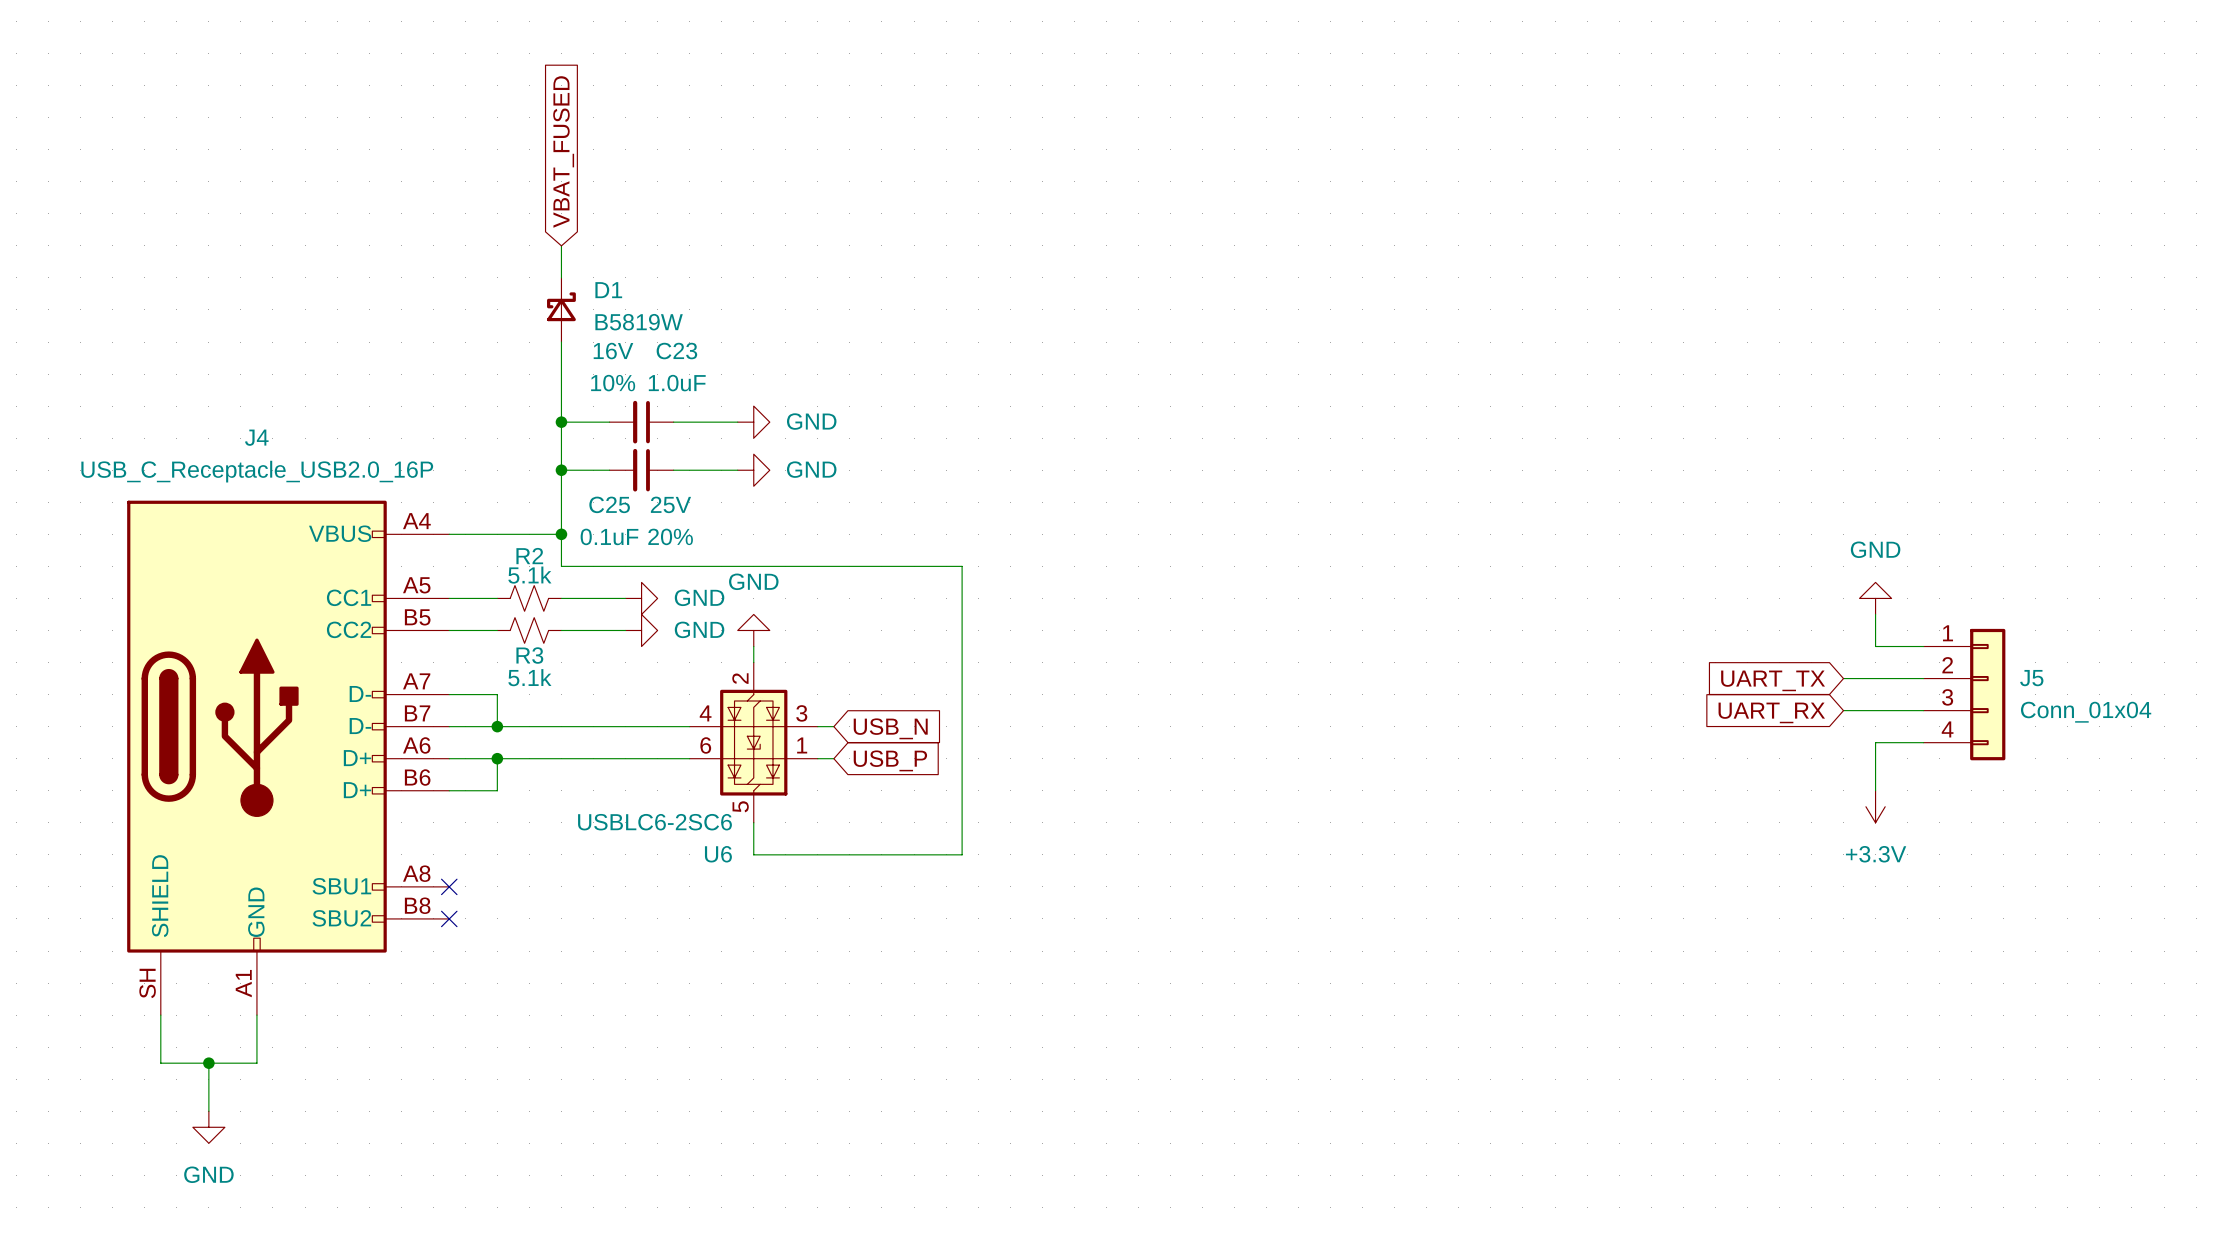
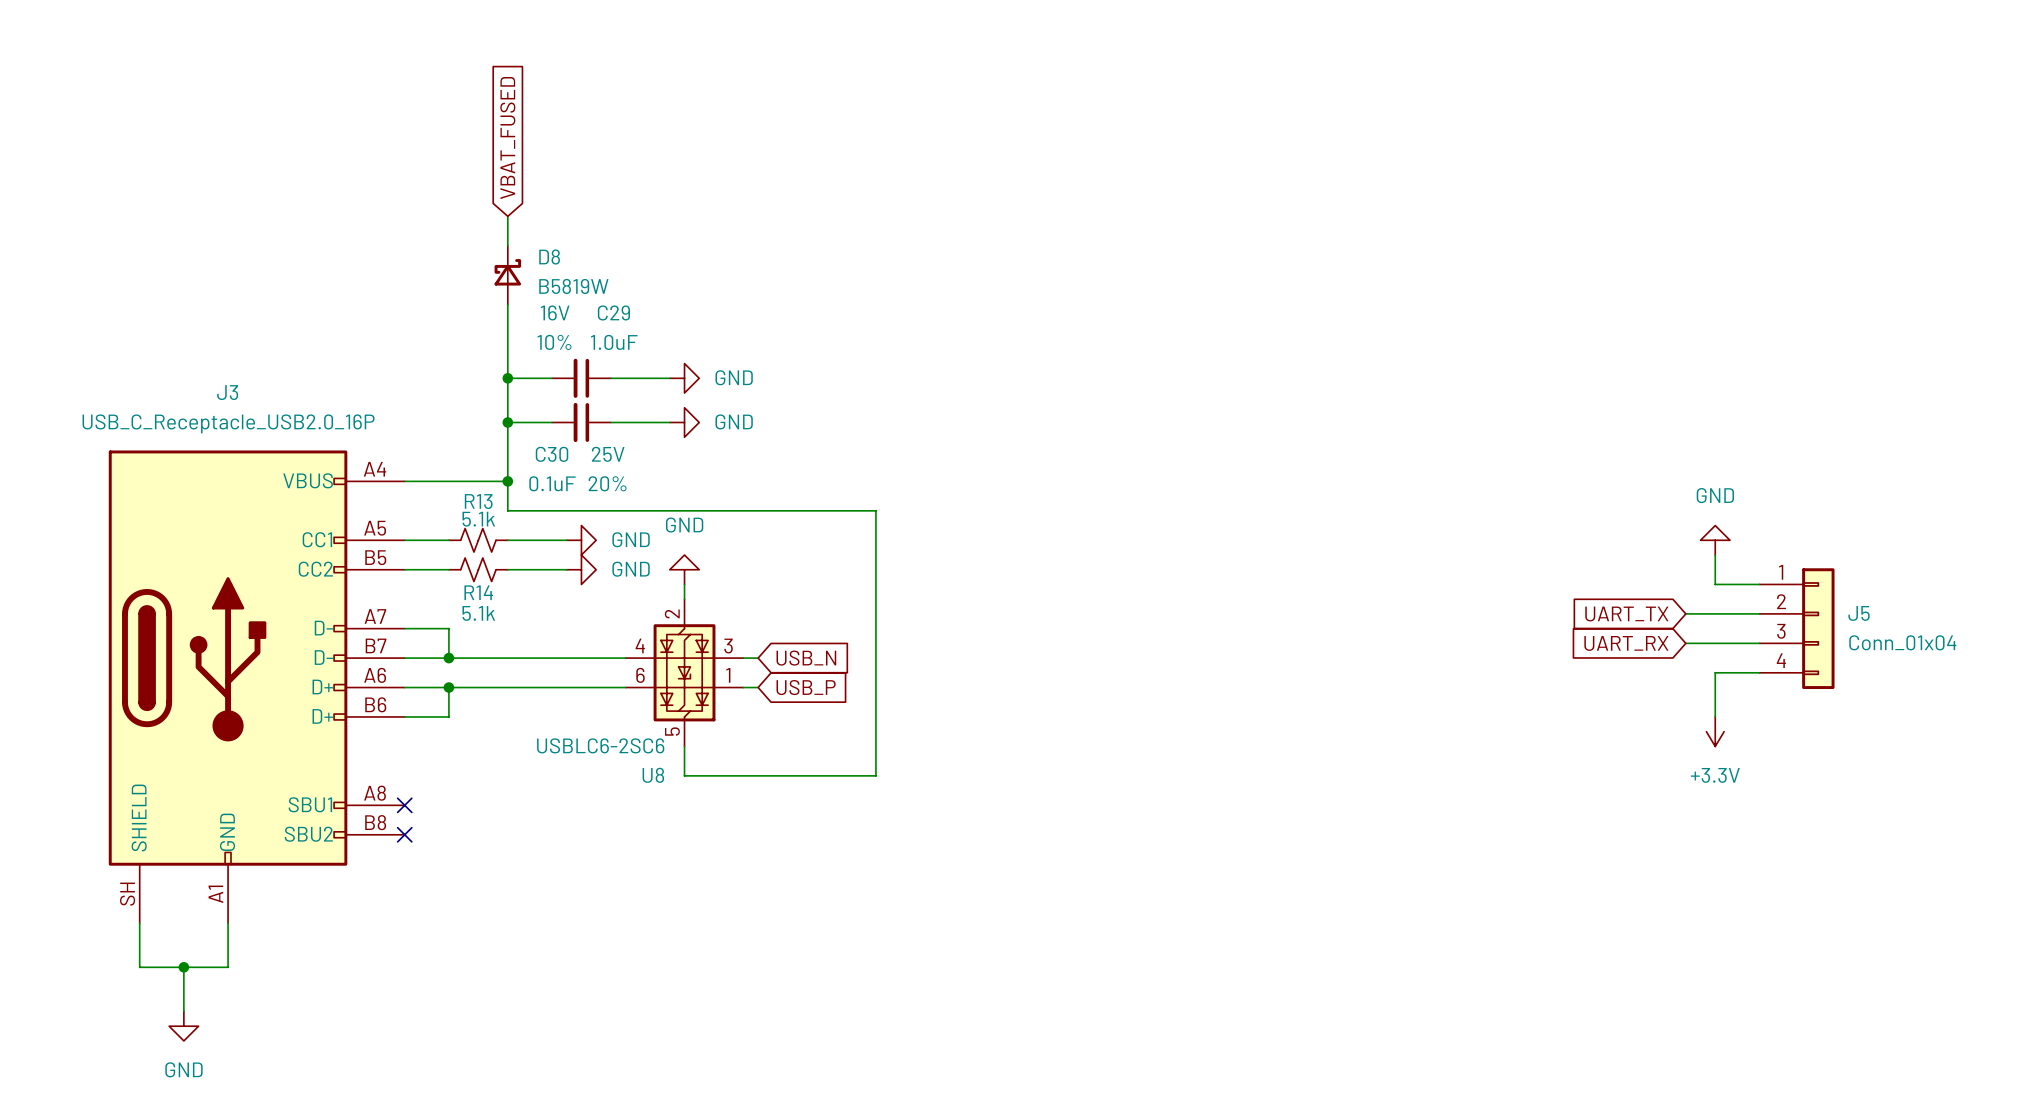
D1 name: D1 (608, 290) -> D8 (549, 257)
C23 name: C23 (676, 351) -> C29 (613, 312)
J4 name: J4 (256, 437) -> J3 (227, 392)
C25 name: C25 (609, 504) -> C30 (552, 454)
R2 name: R2 (529, 556) -> R13 (478, 501)
R3 name: R3 (529, 655) -> R14 (478, 592)
U6 name: U6 (718, 854) -> U8 (653, 775)

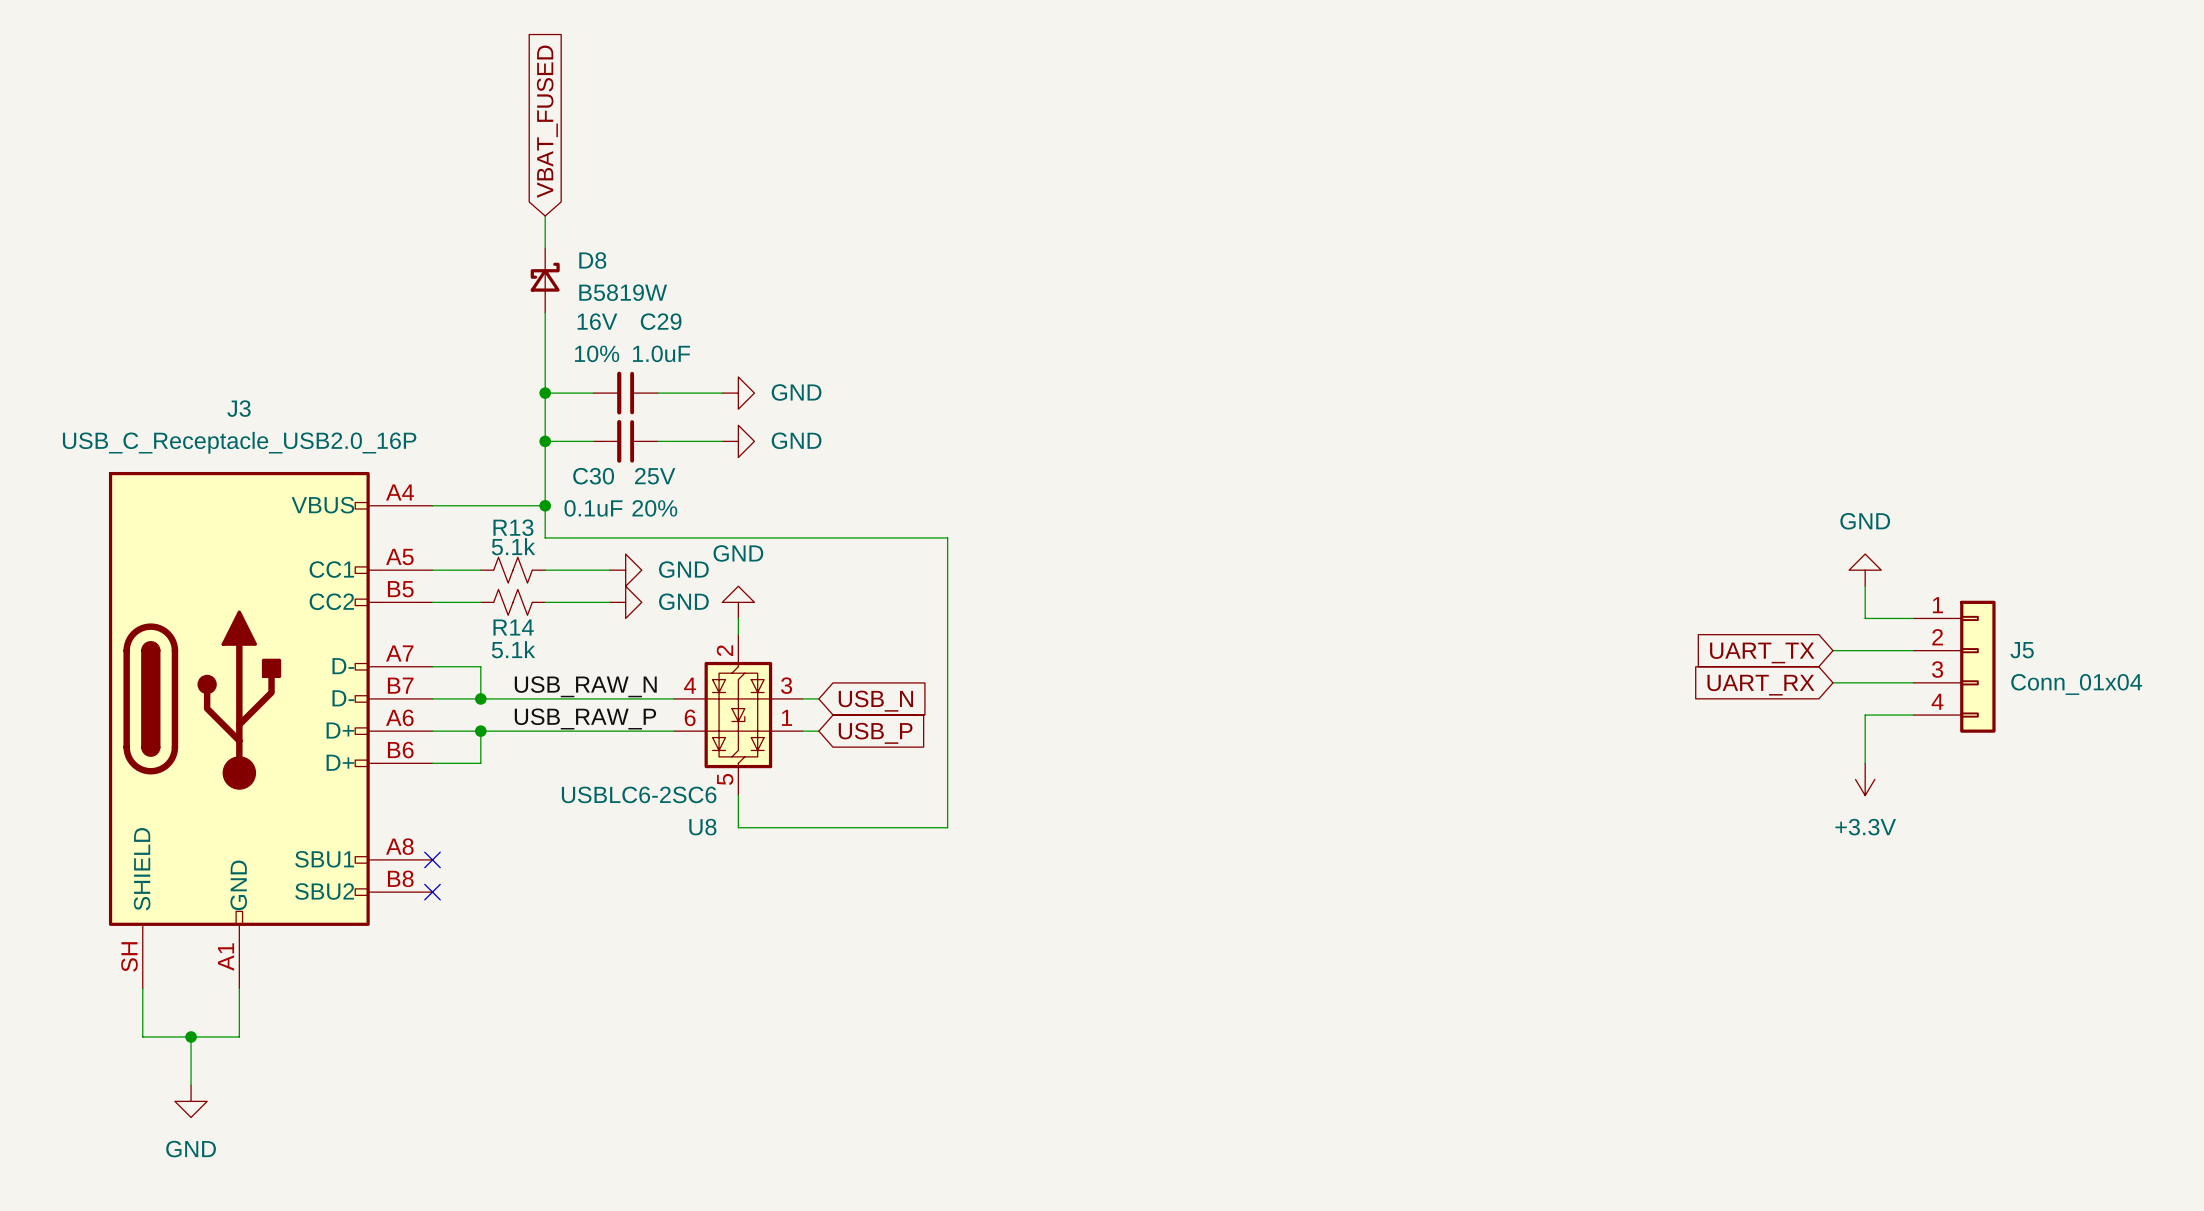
label: none -> USB_RAW_N (585, 686)
label: none -> USB_RAW_P (585, 718)

